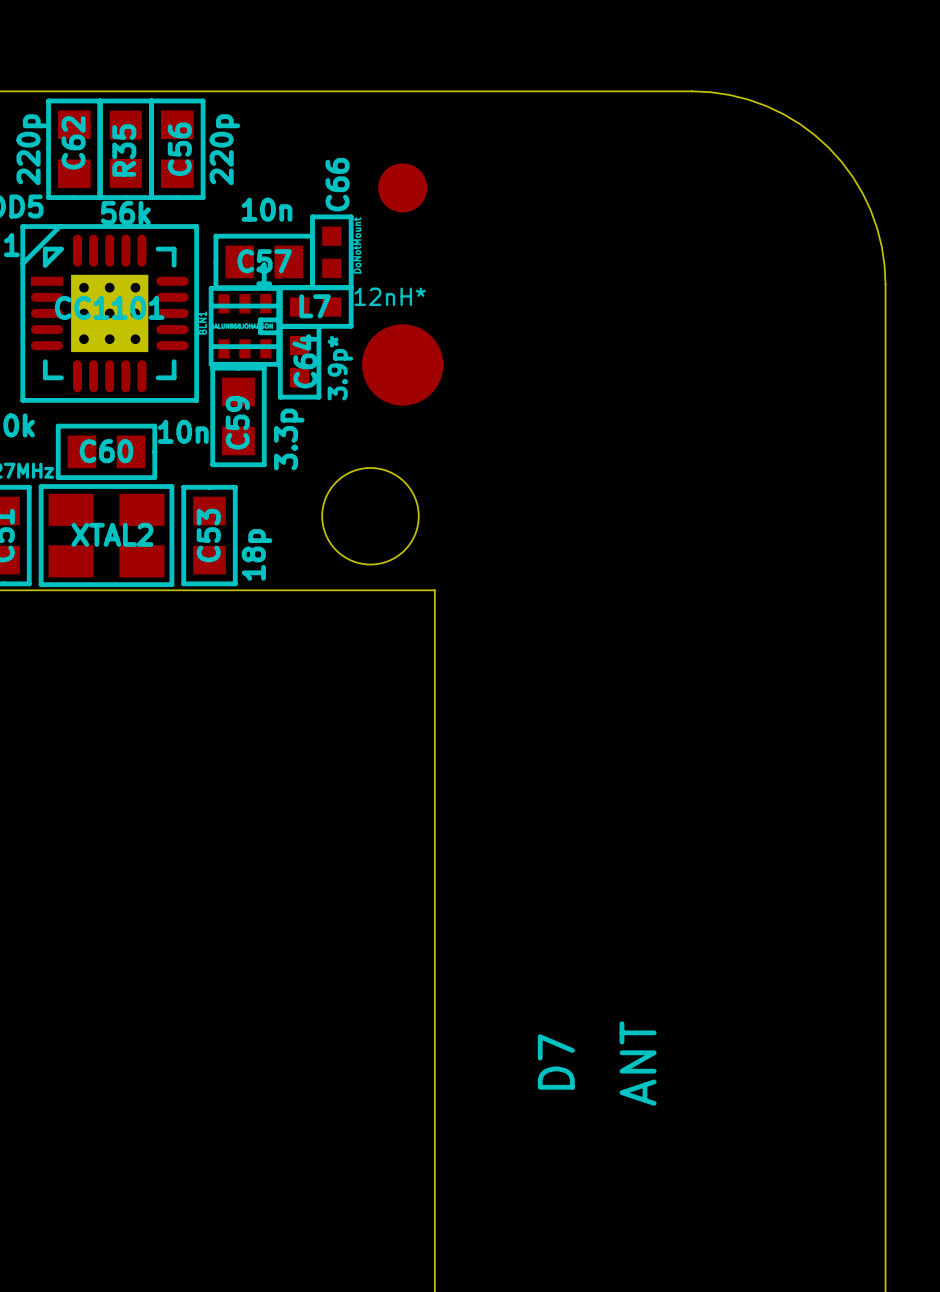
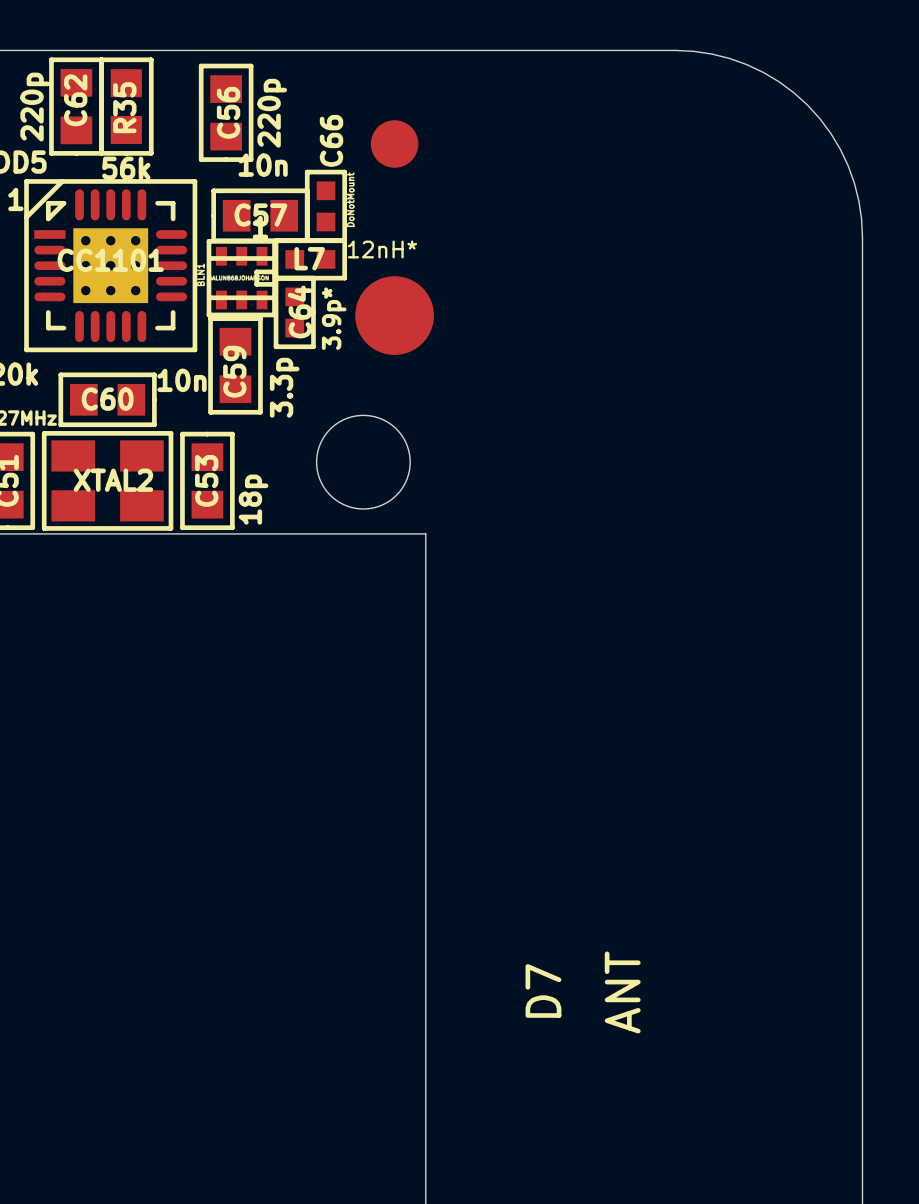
C56 position: (177, 149) -> (226, 112)

